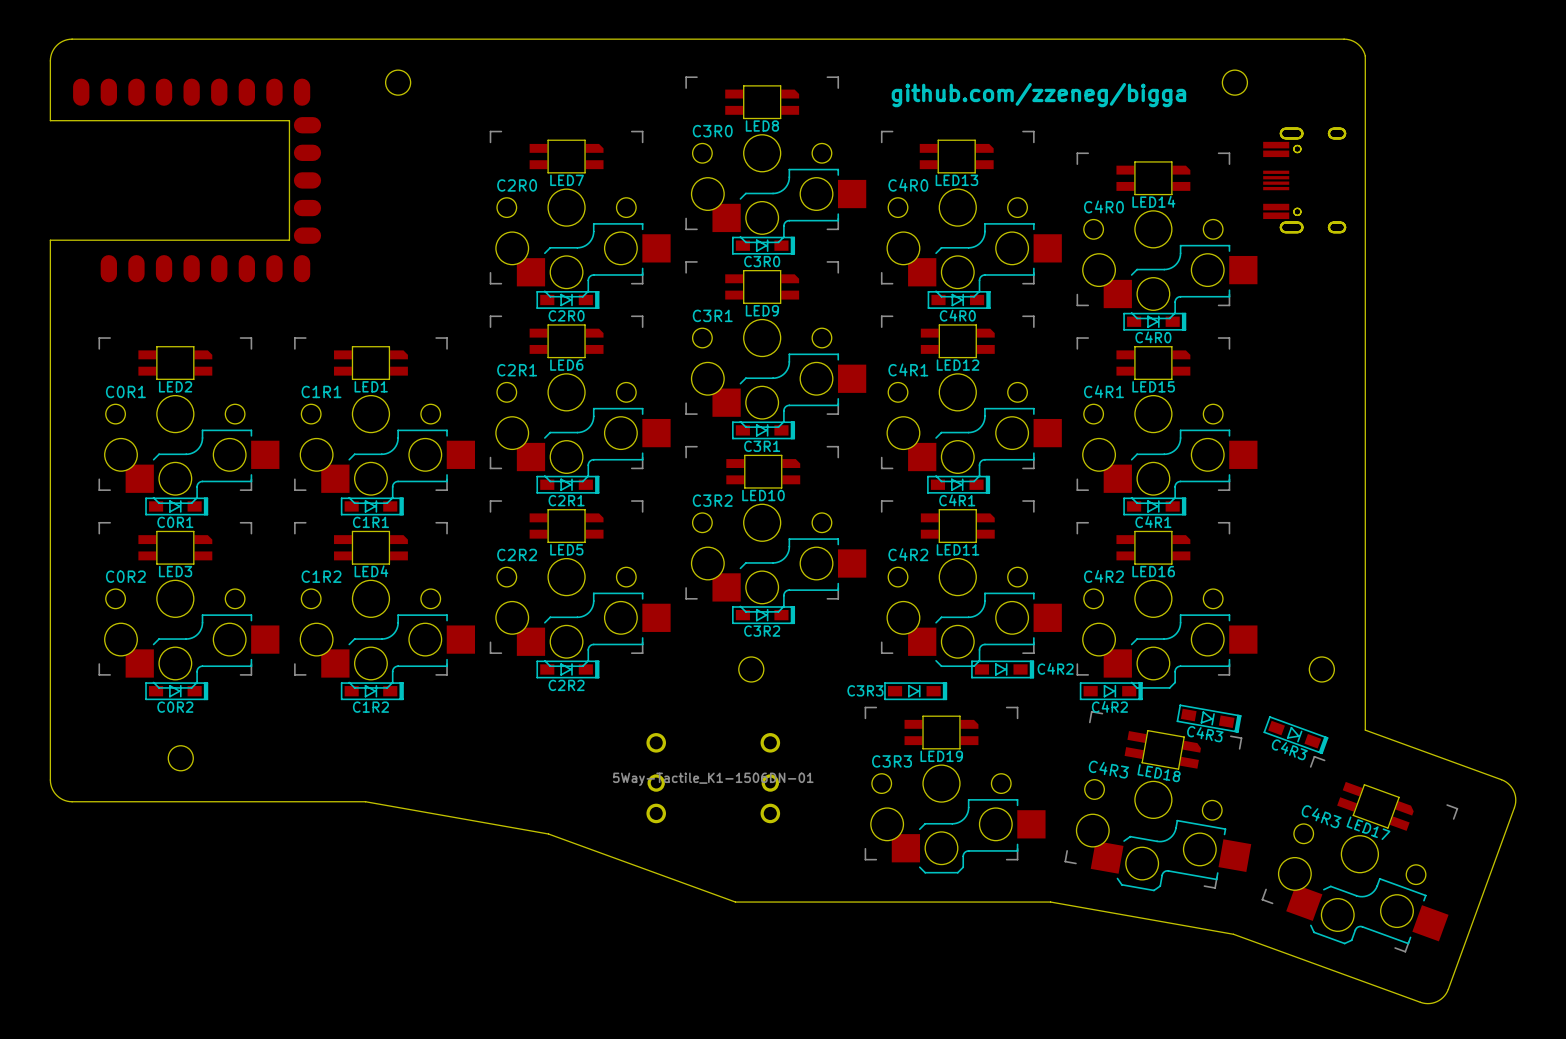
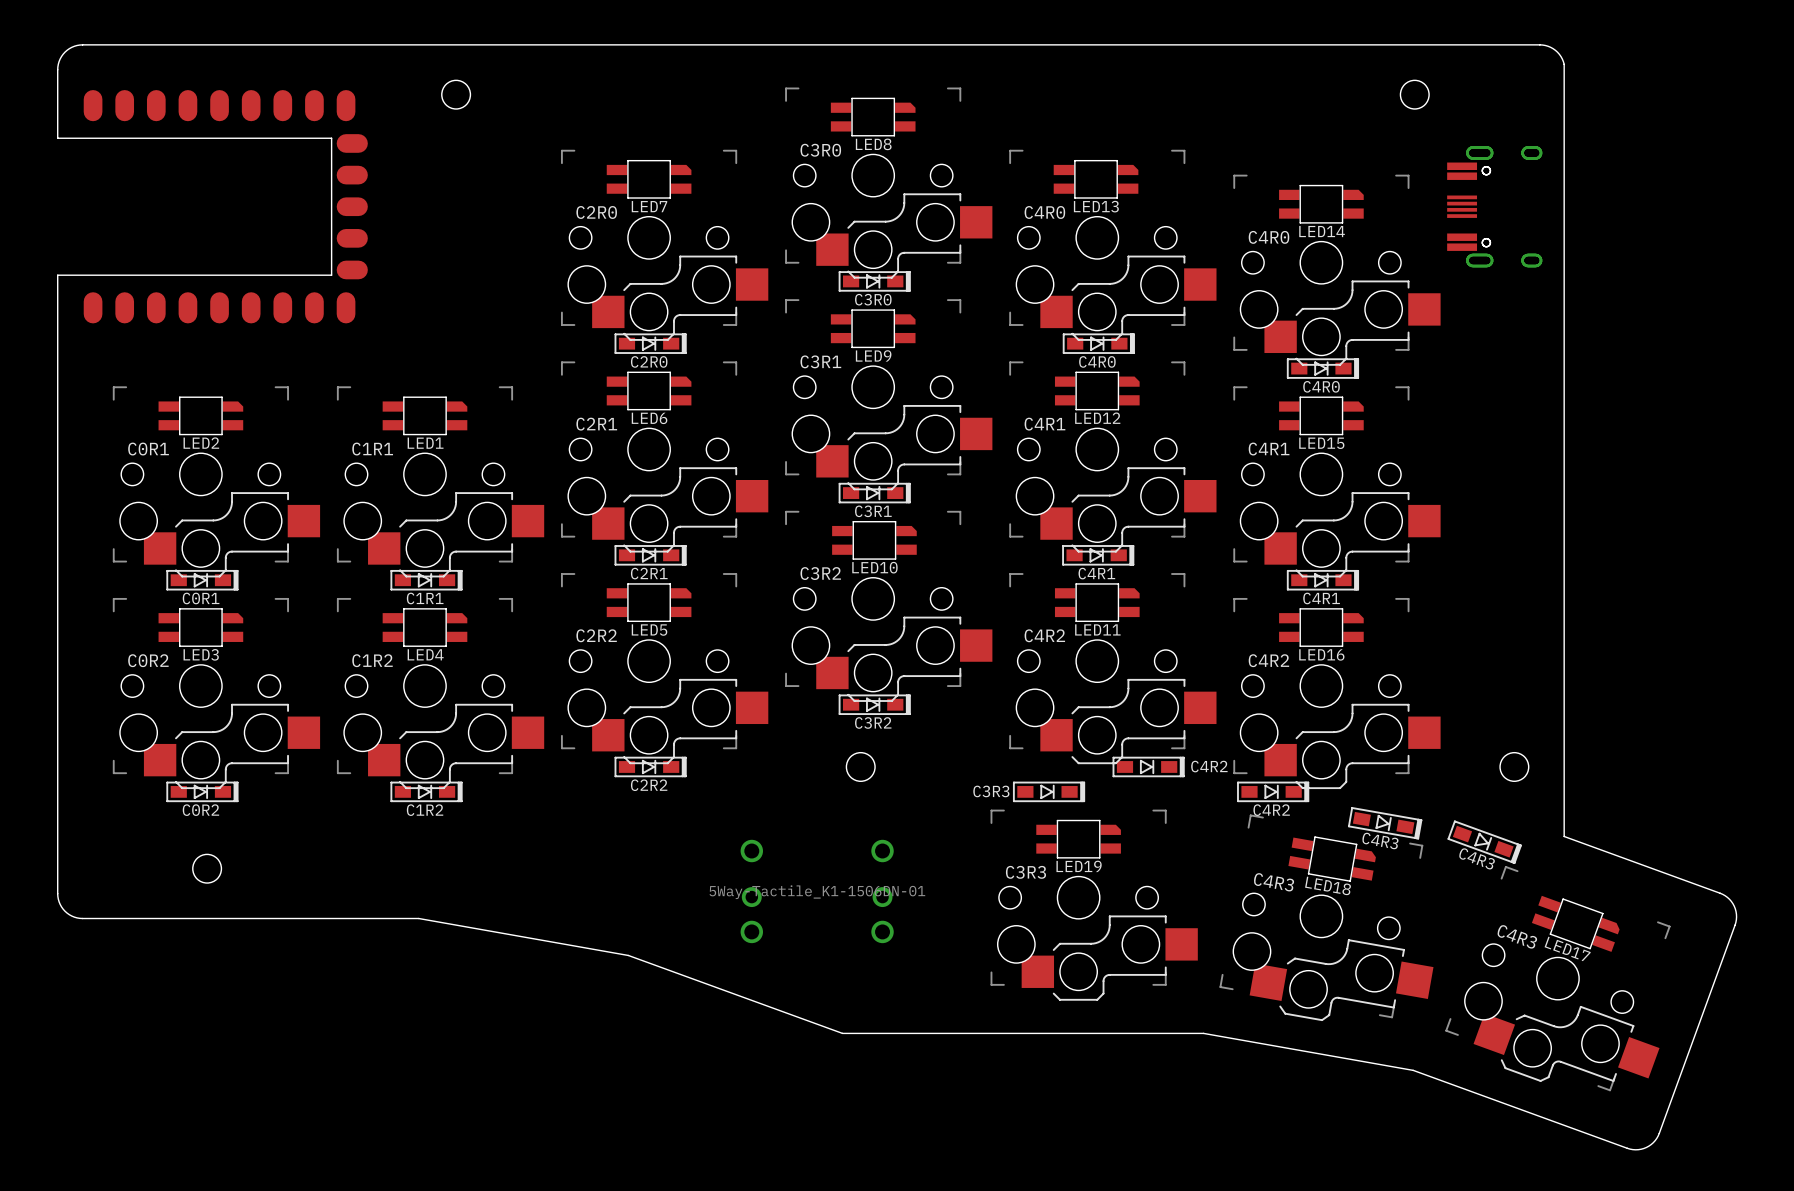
part footprint: [73, 78, 322, 283] -> [83, 90, 368, 324]
text: github.com/zzeneg/bigga (1038, 95) -> none

